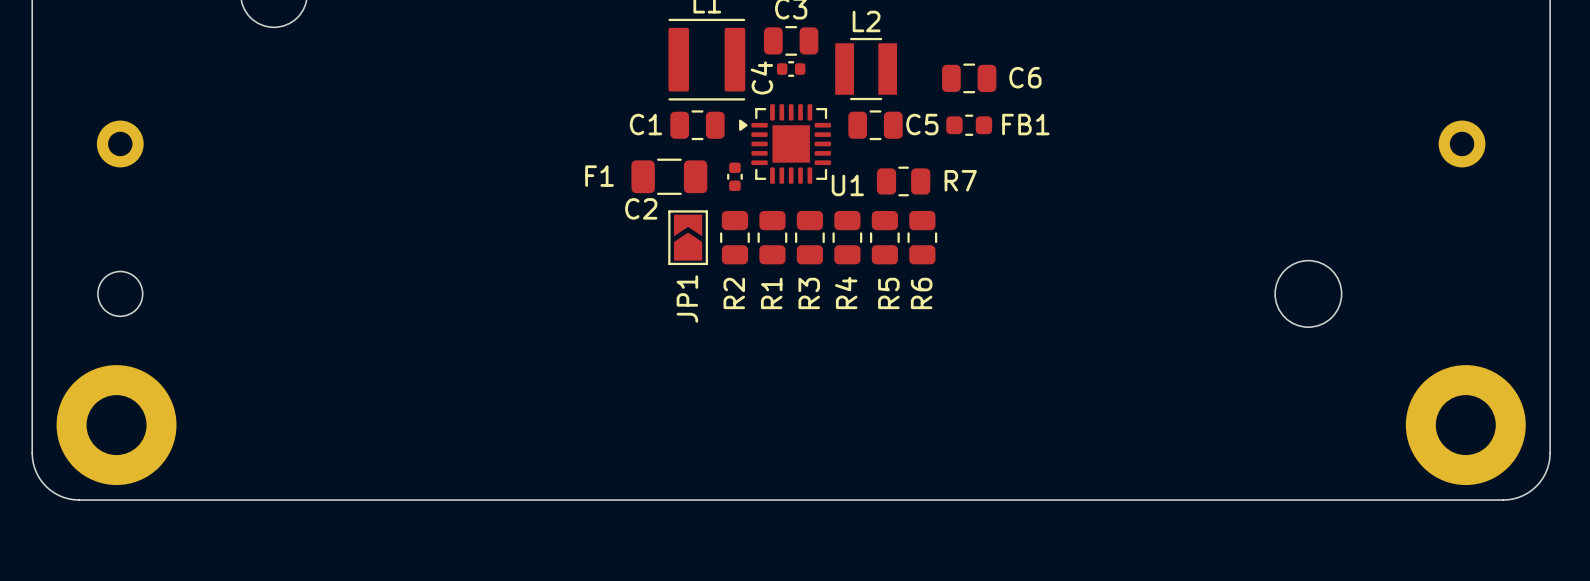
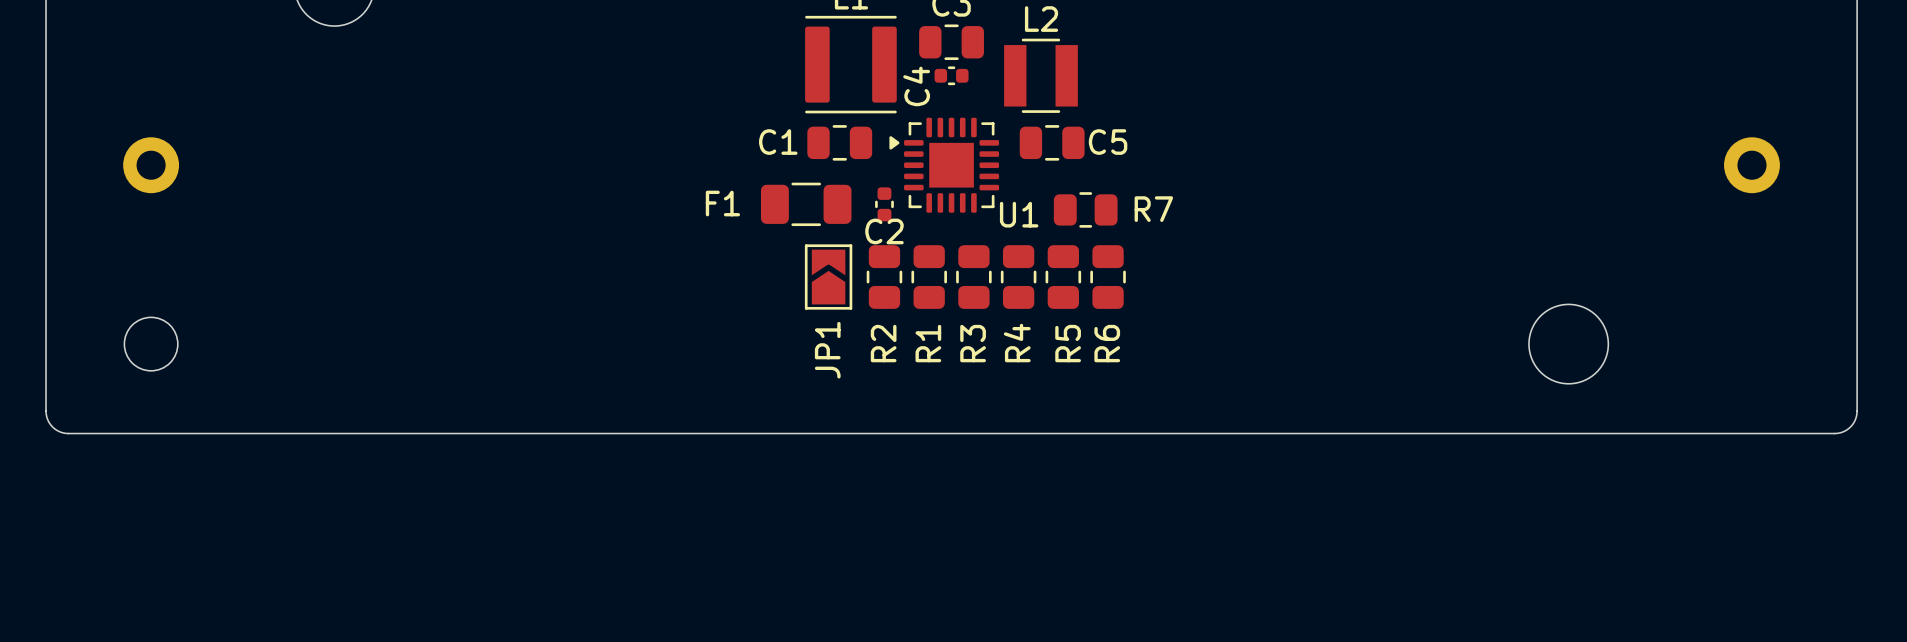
C6: (969, 78) -> none
FB1: (969, 125) -> none
C2 name position: C2 (641, 208) -> C2 (884, 231)
board edge: (32, 350) (32, 453) (34, 468) (42, 482) (49, 489) (63, 497) (79, 500) (1508, 499) (1523, 495) (1532, 489) (1542, 478) (1548, 463) (1550, 350) -> (46, 411) (48, 420) (52, 426) (58, 431) (68, 433) (1834, 433) (1844, 431) (1850, 426) (1855, 418) (1857, 411)
part: (116, 425) -> none
part: (1465, 425) -> none

